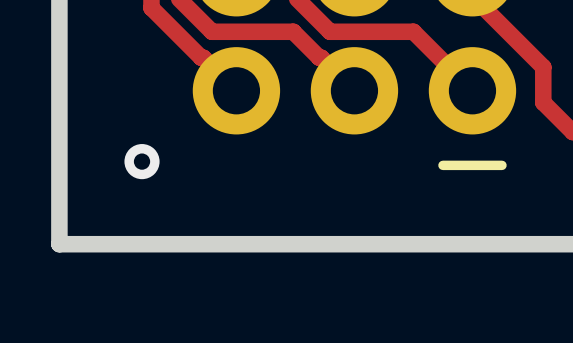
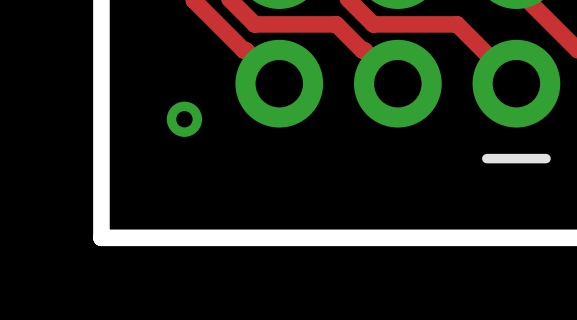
via position: (142, 161) -> (184, 119)

